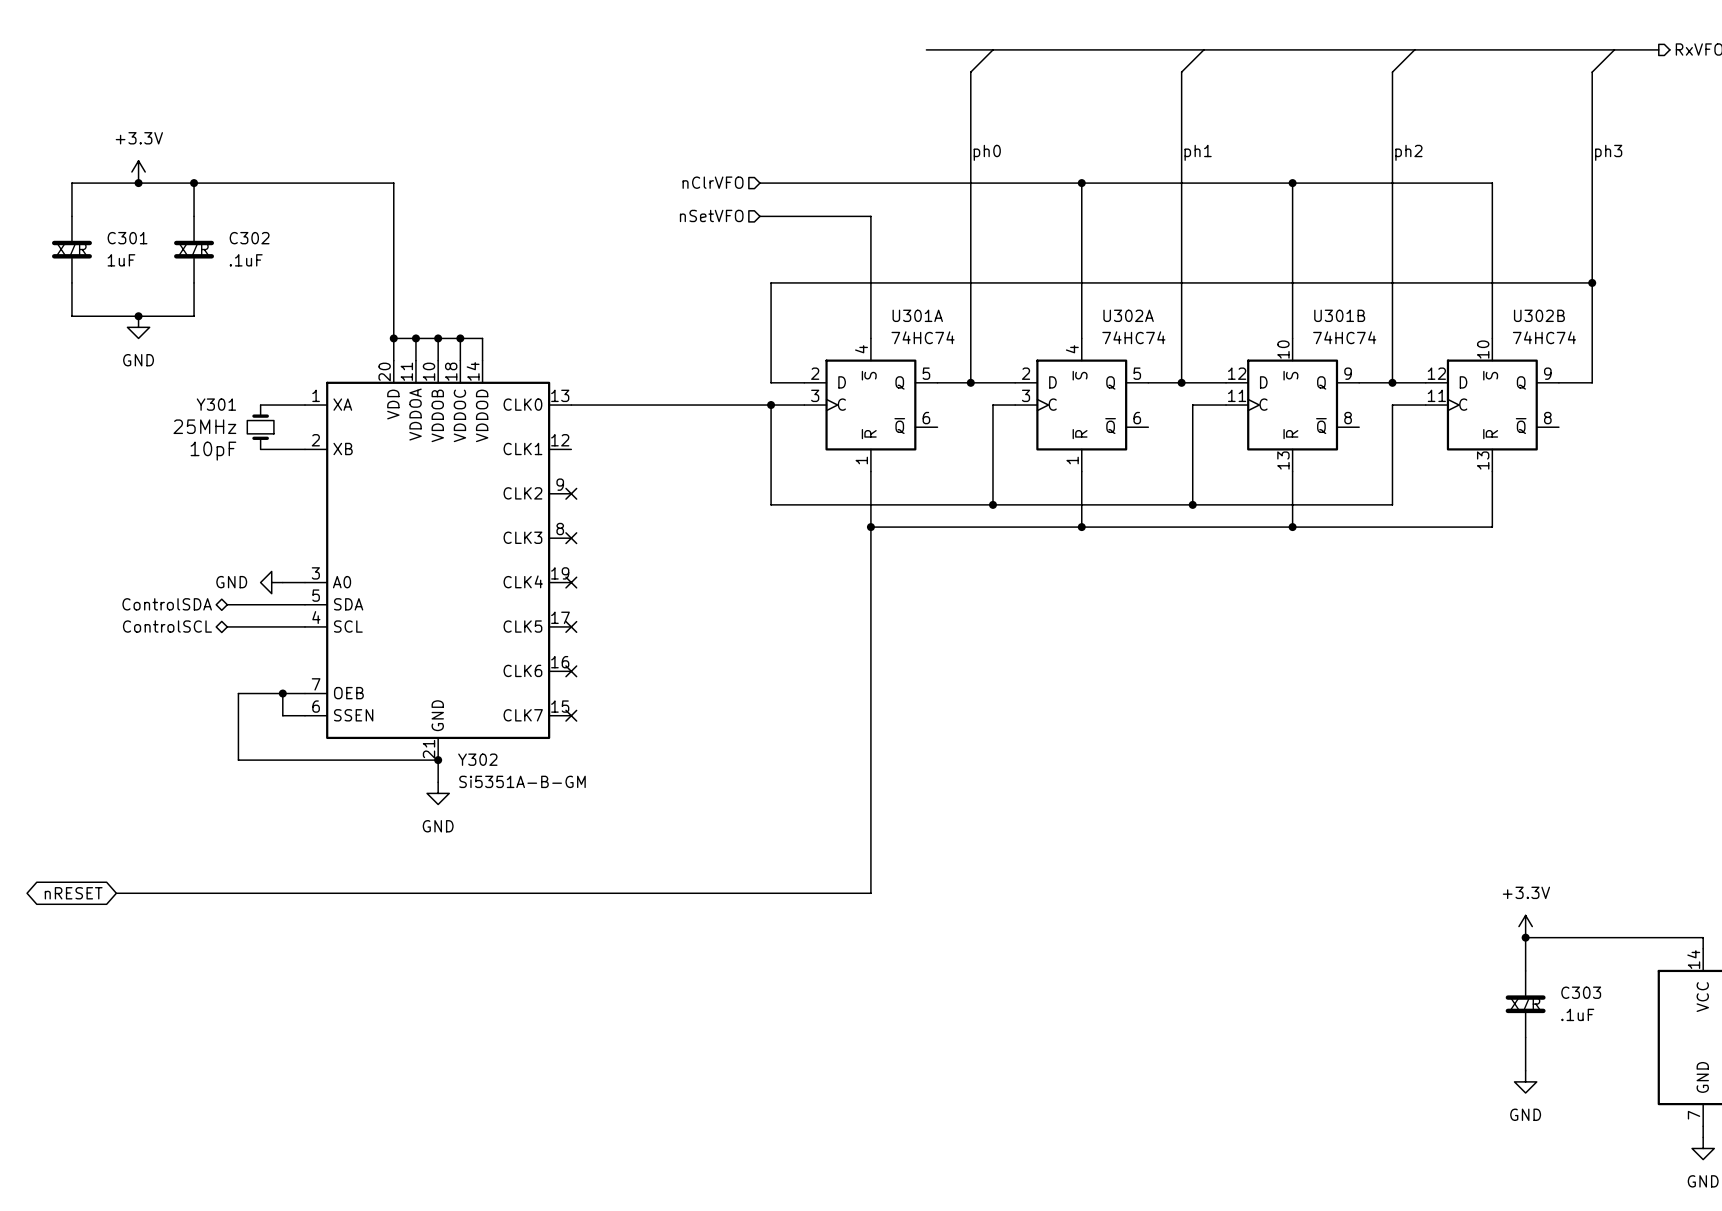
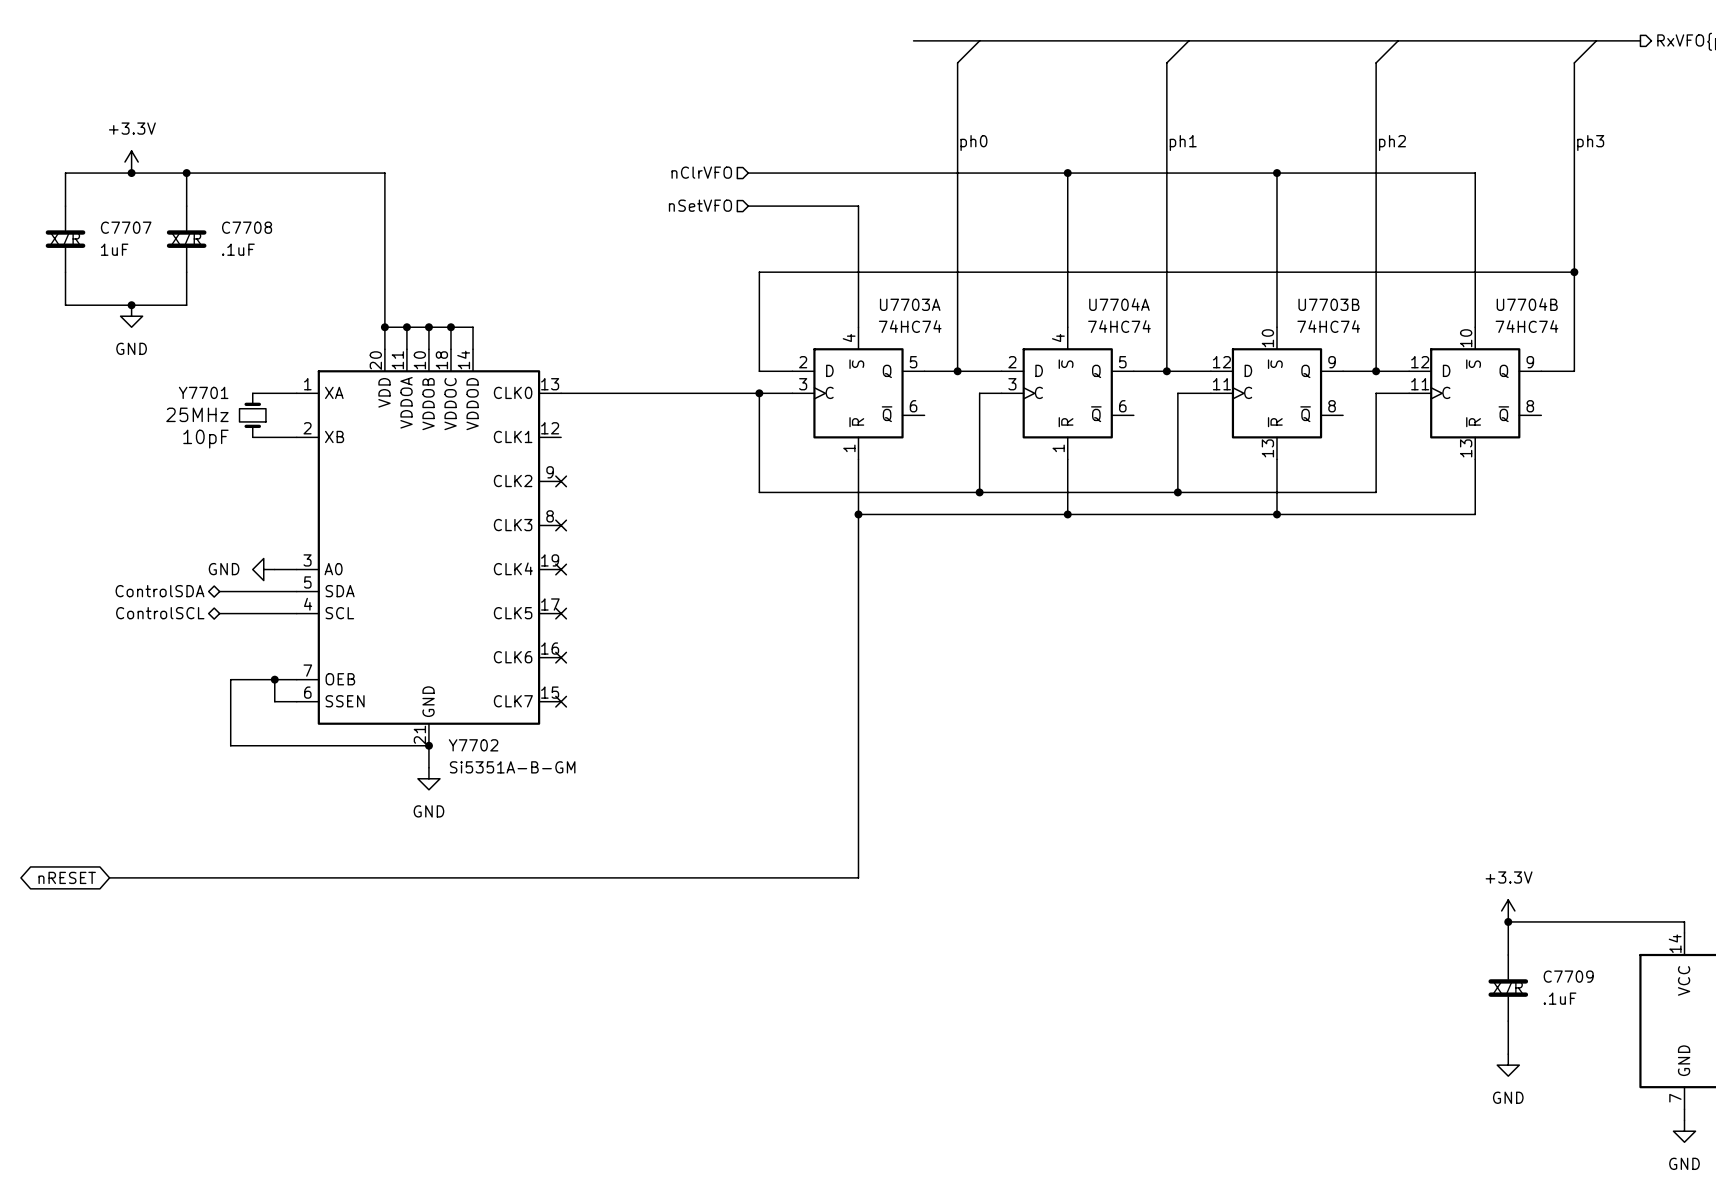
C301 name: C301 (127, 238) -> C7707 (126, 227)
C302 name: C302 (249, 238) -> C7708 (247, 227)
U301A name: U301A (917, 315) -> U7703A (910, 304)
U302A name: U302A (1128, 315) -> U7704A (1119, 304)
U301B name: U301B (1339, 315) -> U7703B (1328, 304)
U302B name: U302B (1539, 315) -> U7704B (1527, 304)
Y301 name: Y301 (216, 404) -> Y7701 (203, 392)
Y302 name: Y302 (477, 759) -> Y7702 (473, 745)
C303 name: C303 (1581, 992) -> C7709 (1568, 976)

